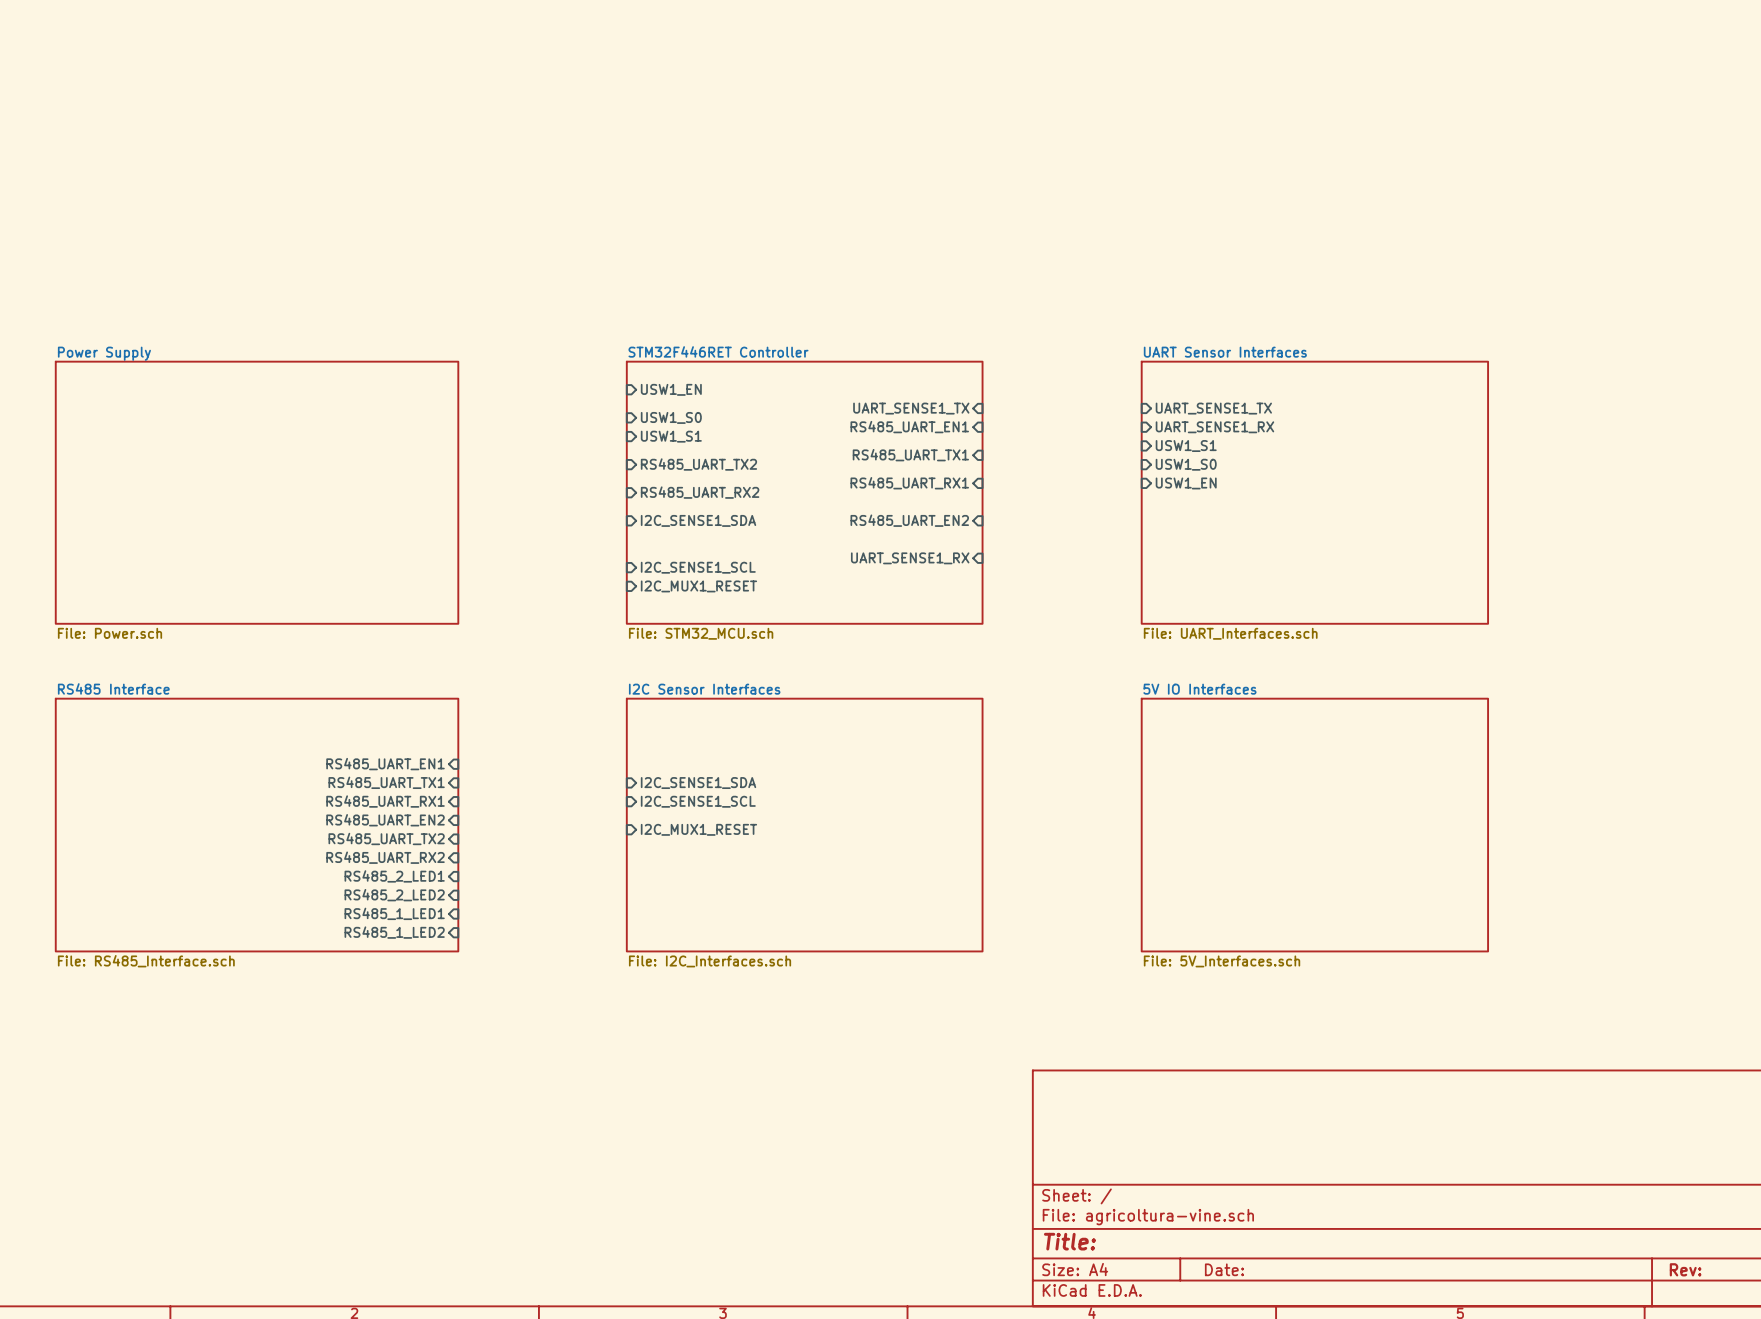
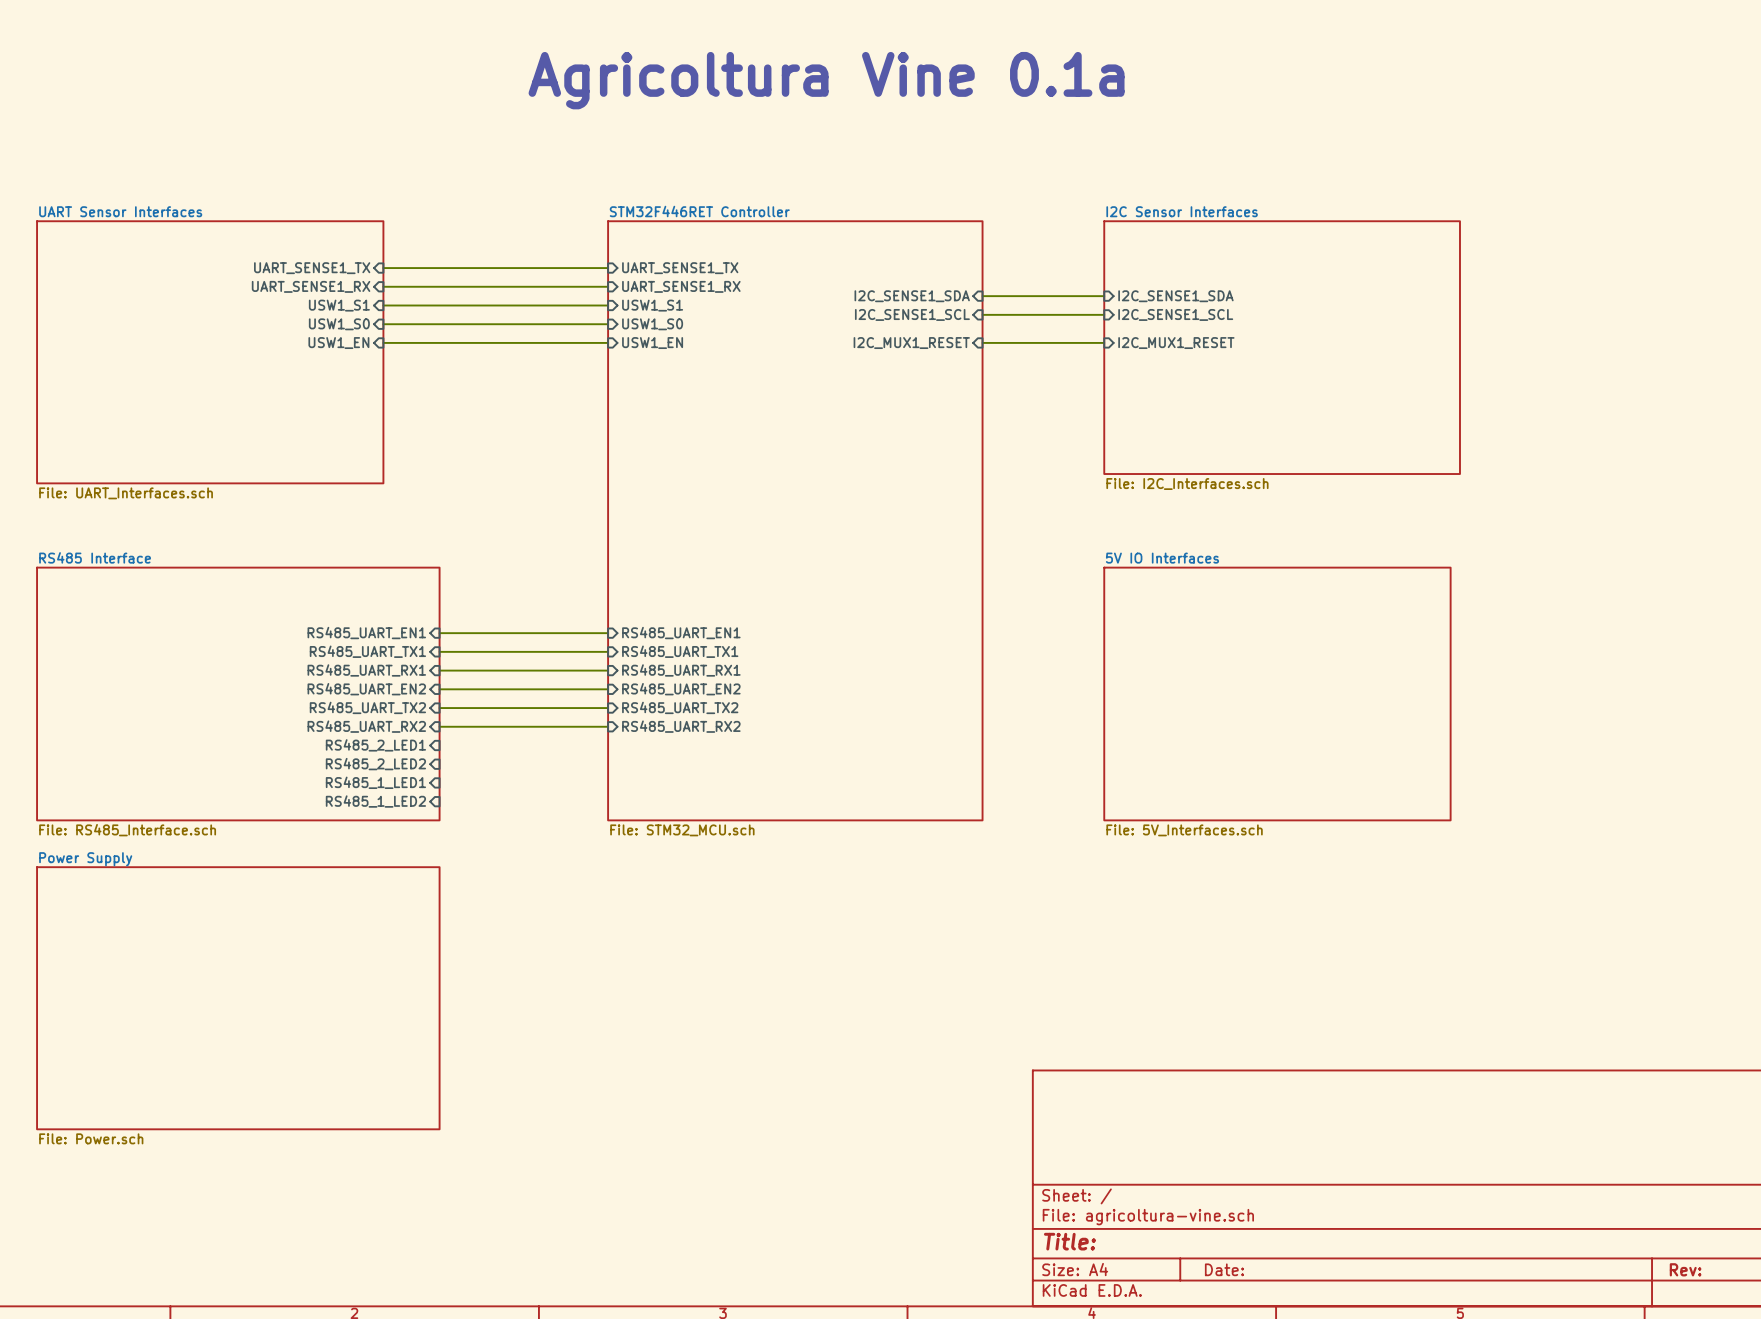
text: none -> Agricoltura Vine 0.1a (826, 80)
sheet pin: none -> UART_SENSE1_TX (312, 268)
wire: none -> (383, 268) (608, 268)
sheet pin: none -> UART_SENSE1_TX (680, 268)
sheet pin: none -> UART_SENSE1_RX (311, 286)
wire: none -> (383, 286) (608, 286)
sheet pin: none -> UART_SENSE1_RX (681, 286)
sheet pin: none -> I2C_SENSE1_SDA (912, 296)
wire: none -> (982, 296) (1104, 296)
sheet pin: none -> I2C_SENSE1_SDA (1175, 296)
sheet pin: none -> USW1_S1 (339, 305)
wire: none -> (383, 305) (608, 305)
sheet pin: none -> I2C_SENSE1_SCL (912, 314)
wire: none -> (982, 314) (1104, 314)
sheet pin: none -> I2C_SENSE1_SCL (1175, 314)
sheet pin: none -> USW1_S0 (339, 324)
wire: none -> (383, 324) (608, 324)
wire: none -> (383, 342) (608, 342)
wire: none -> (982, 342) (1104, 342)
sheet pin: none -> USW1_EN (338, 343)
sheet pin: none -> I2C_MUX1_RESET (911, 343)
sheet pin: none -> I2C_MUX1_RESET (1176, 343)
sheet STM32F446RET Controller name position: STM32F446RET Controller (718, 351) -> STM32F446RET Controller (699, 211)
sheet UART Sensor Interfaces: none -> File: UART_Interfaces.sch (210, 352)
sheet STM32F446RET Controller shape: [626, 361, 983, 624] -> [608, 221, 983, 821]
sheet pin position: USW1_EN (671, 389) -> USW1_EN (652, 343)
sheet pin: UART_SENSE1_TX (911, 408) -> none
sheet pin: UART_SENSE1_TX (1213, 408) -> none
sheet pin position: USW1_S0 (671, 417) -> USW1_S0 (652, 324)
sheet pin: RS485_UART_EN1 (909, 427) -> none
sheet pin: UART_SENSE1_RX (1214, 427) -> none
sheet pin position: USW1_S1 (671, 436) -> USW1_S1 (652, 305)
sheet pin: USW1_S1 (1186, 446) -> none
sheet pin: RS485_UART_TX1 (910, 455) -> none
sheet pin: RS485_UART_TX2 (698, 464) -> none
sheet pin: USW1_S0 (1186, 464) -> none
sheet pin: RS485_UART_RX1 (909, 483) -> none
sheet pin: USW1_EN (1186, 483) -> none
sheet Power Supply: File: Power.sch (257, 492) -> none
sheet pin: RS485_UART_RX2 (700, 492) -> none
sheet UART Sensor Interfaces: File: UART_Interfaces.sch (1314, 492) -> none
sheet pin: I2C_SENSE1_SDA (698, 520) -> none
sheet pin: RS485_UART_EN2 (909, 520) -> none
sheet pin: UART_SENSE1_RX (910, 558) -> none
sheet pin: I2C_SENSE1_SCL (698, 567) -> none
sheet pin: I2C_MUX1_RESET (698, 586) -> none
sheet pin: none -> RS485_UART_EN1 (366, 633)
wire: none -> (439, 633) (608, 633)
sheet pin: none -> RS485_UART_EN1 (681, 633)
sheet STM32F446RET Controller value position: File: STM32_MCU.sch (701, 633) -> File: STM32_MCU.sch (682, 830)
sheet pin: none -> RS485_UART_TX1 (367, 651)
wire: none -> (439, 651) (608, 651)
sheet pin: none -> RS485_UART_TX1 (680, 651)
sheet pin: none -> RS485_UART_RX1 (366, 670)
wire: none -> (439, 670) (608, 670)
sheet pin: none -> RS485_UART_RX1 (681, 670)
sheet pin: none -> RS485_UART_EN2 (366, 689)
wire: none -> (439, 689) (608, 689)
sheet pin: none -> RS485_UART_EN2 (681, 689)
sheet pin: none -> RS485_UART_TX2 (367, 707)
sheet pin: none -> RS485_UART_TX2 (680, 707)
wire: none -> (439, 708) (608, 708)
sheet pin: none -> RS485_UART_RX2 (366, 726)
wire: none -> (439, 726) (608, 726)
sheet pin: none -> RS485_UART_RX2 (681, 726)
sheet pin: RS485_UART_EN1 (385, 764) -> none
sheet pin: RS485_UART_TX1 (386, 782) -> none
sheet pin: I2C_SENSE1_SDA (698, 783) -> none
sheet pin: RS485_UART_RX1 (385, 801) -> none
sheet pin: I2C_SENSE1_SCL (698, 801) -> none
sheet pin: RS485_UART_EN2 (385, 820) -> none
sheet RS485 Interface position: (257, 825) -> (238, 694)
sheet I2C Sensor Interfaces position: (804, 825) -> (1282, 347)
sheet 5V IO Interfaces position: (1314, 825) -> (1277, 694)
sheet pin: I2C_MUX1_RESET (698, 829) -> none
sheet pin: RS485_UART_TX2 (386, 838) -> none
sheet pin: RS485_UART_RX2 (385, 857) -> none
sheet pin position: RS485_2_LED1 (394, 876) -> RS485_2_LED1 (375, 745)
sheet pin position: RS485_2_LED2 (394, 895) -> RS485_2_LED2 (375, 764)
sheet pin position: RS485_1_LED1 (394, 913) -> RS485_1_LED1 (375, 782)
sheet pin position: RS485_1_LED2 (394, 932) -> RS485_1_LED2 (375, 801)
sheet Power Supply: none -> File: Power.sch (238, 998)

